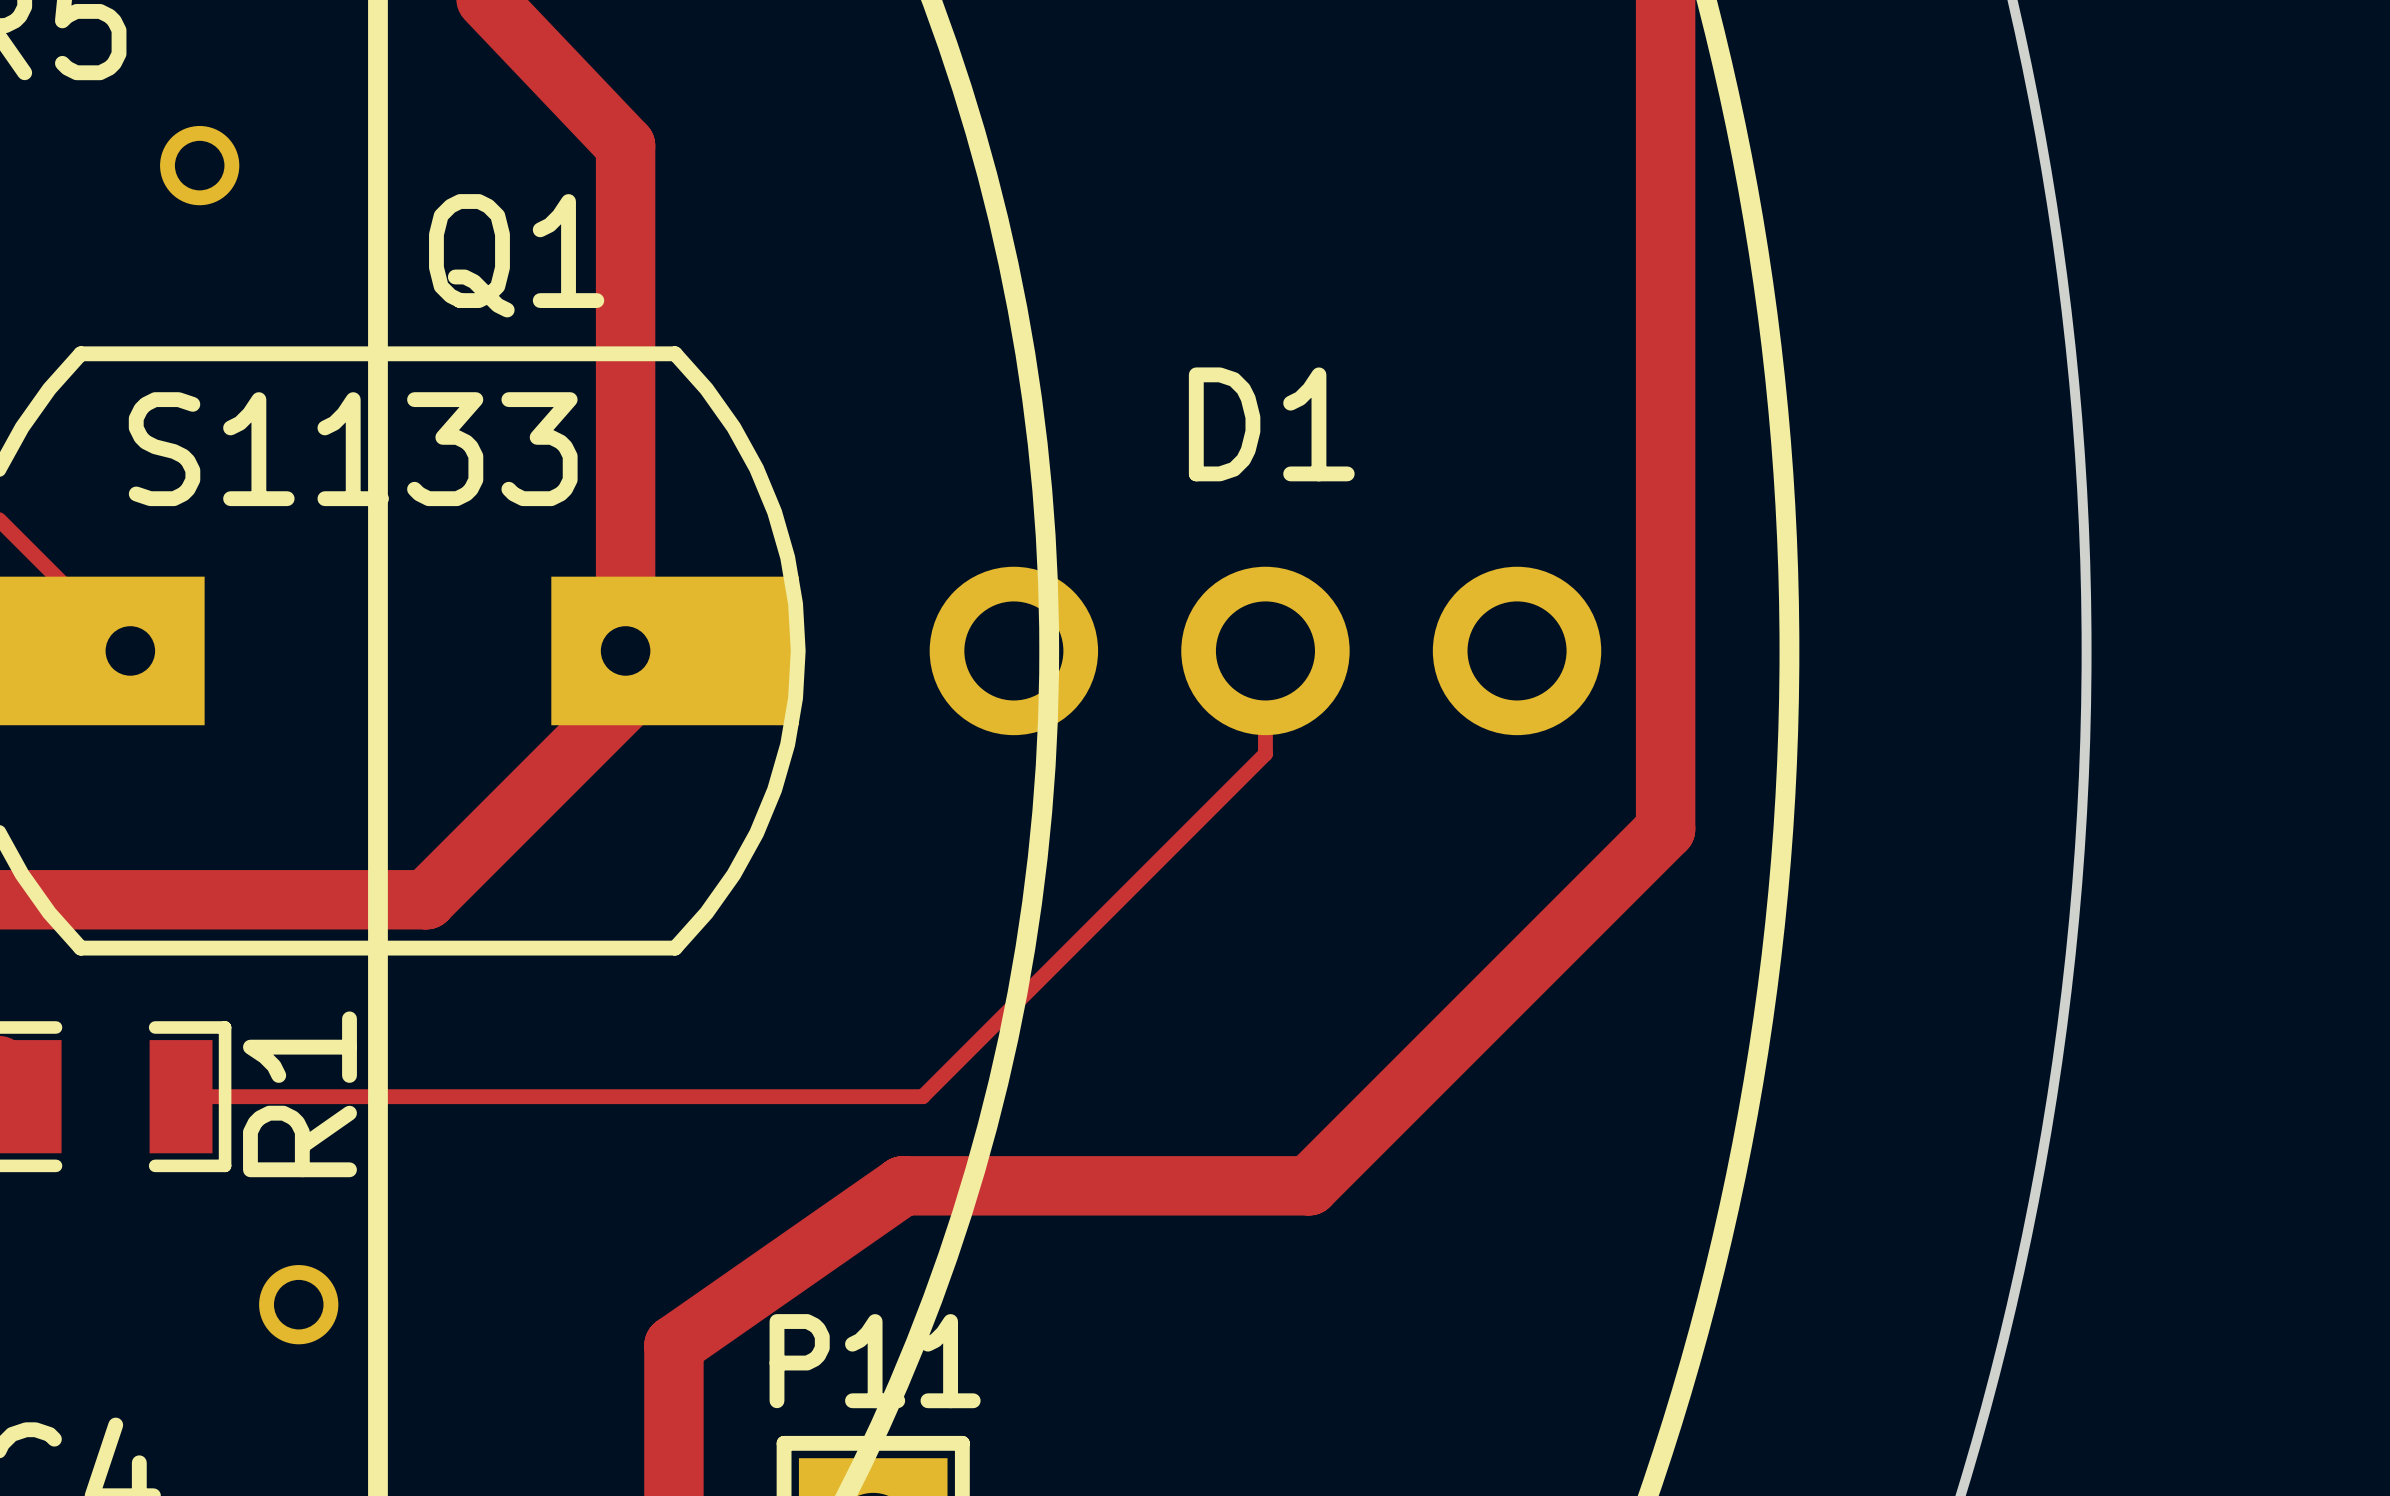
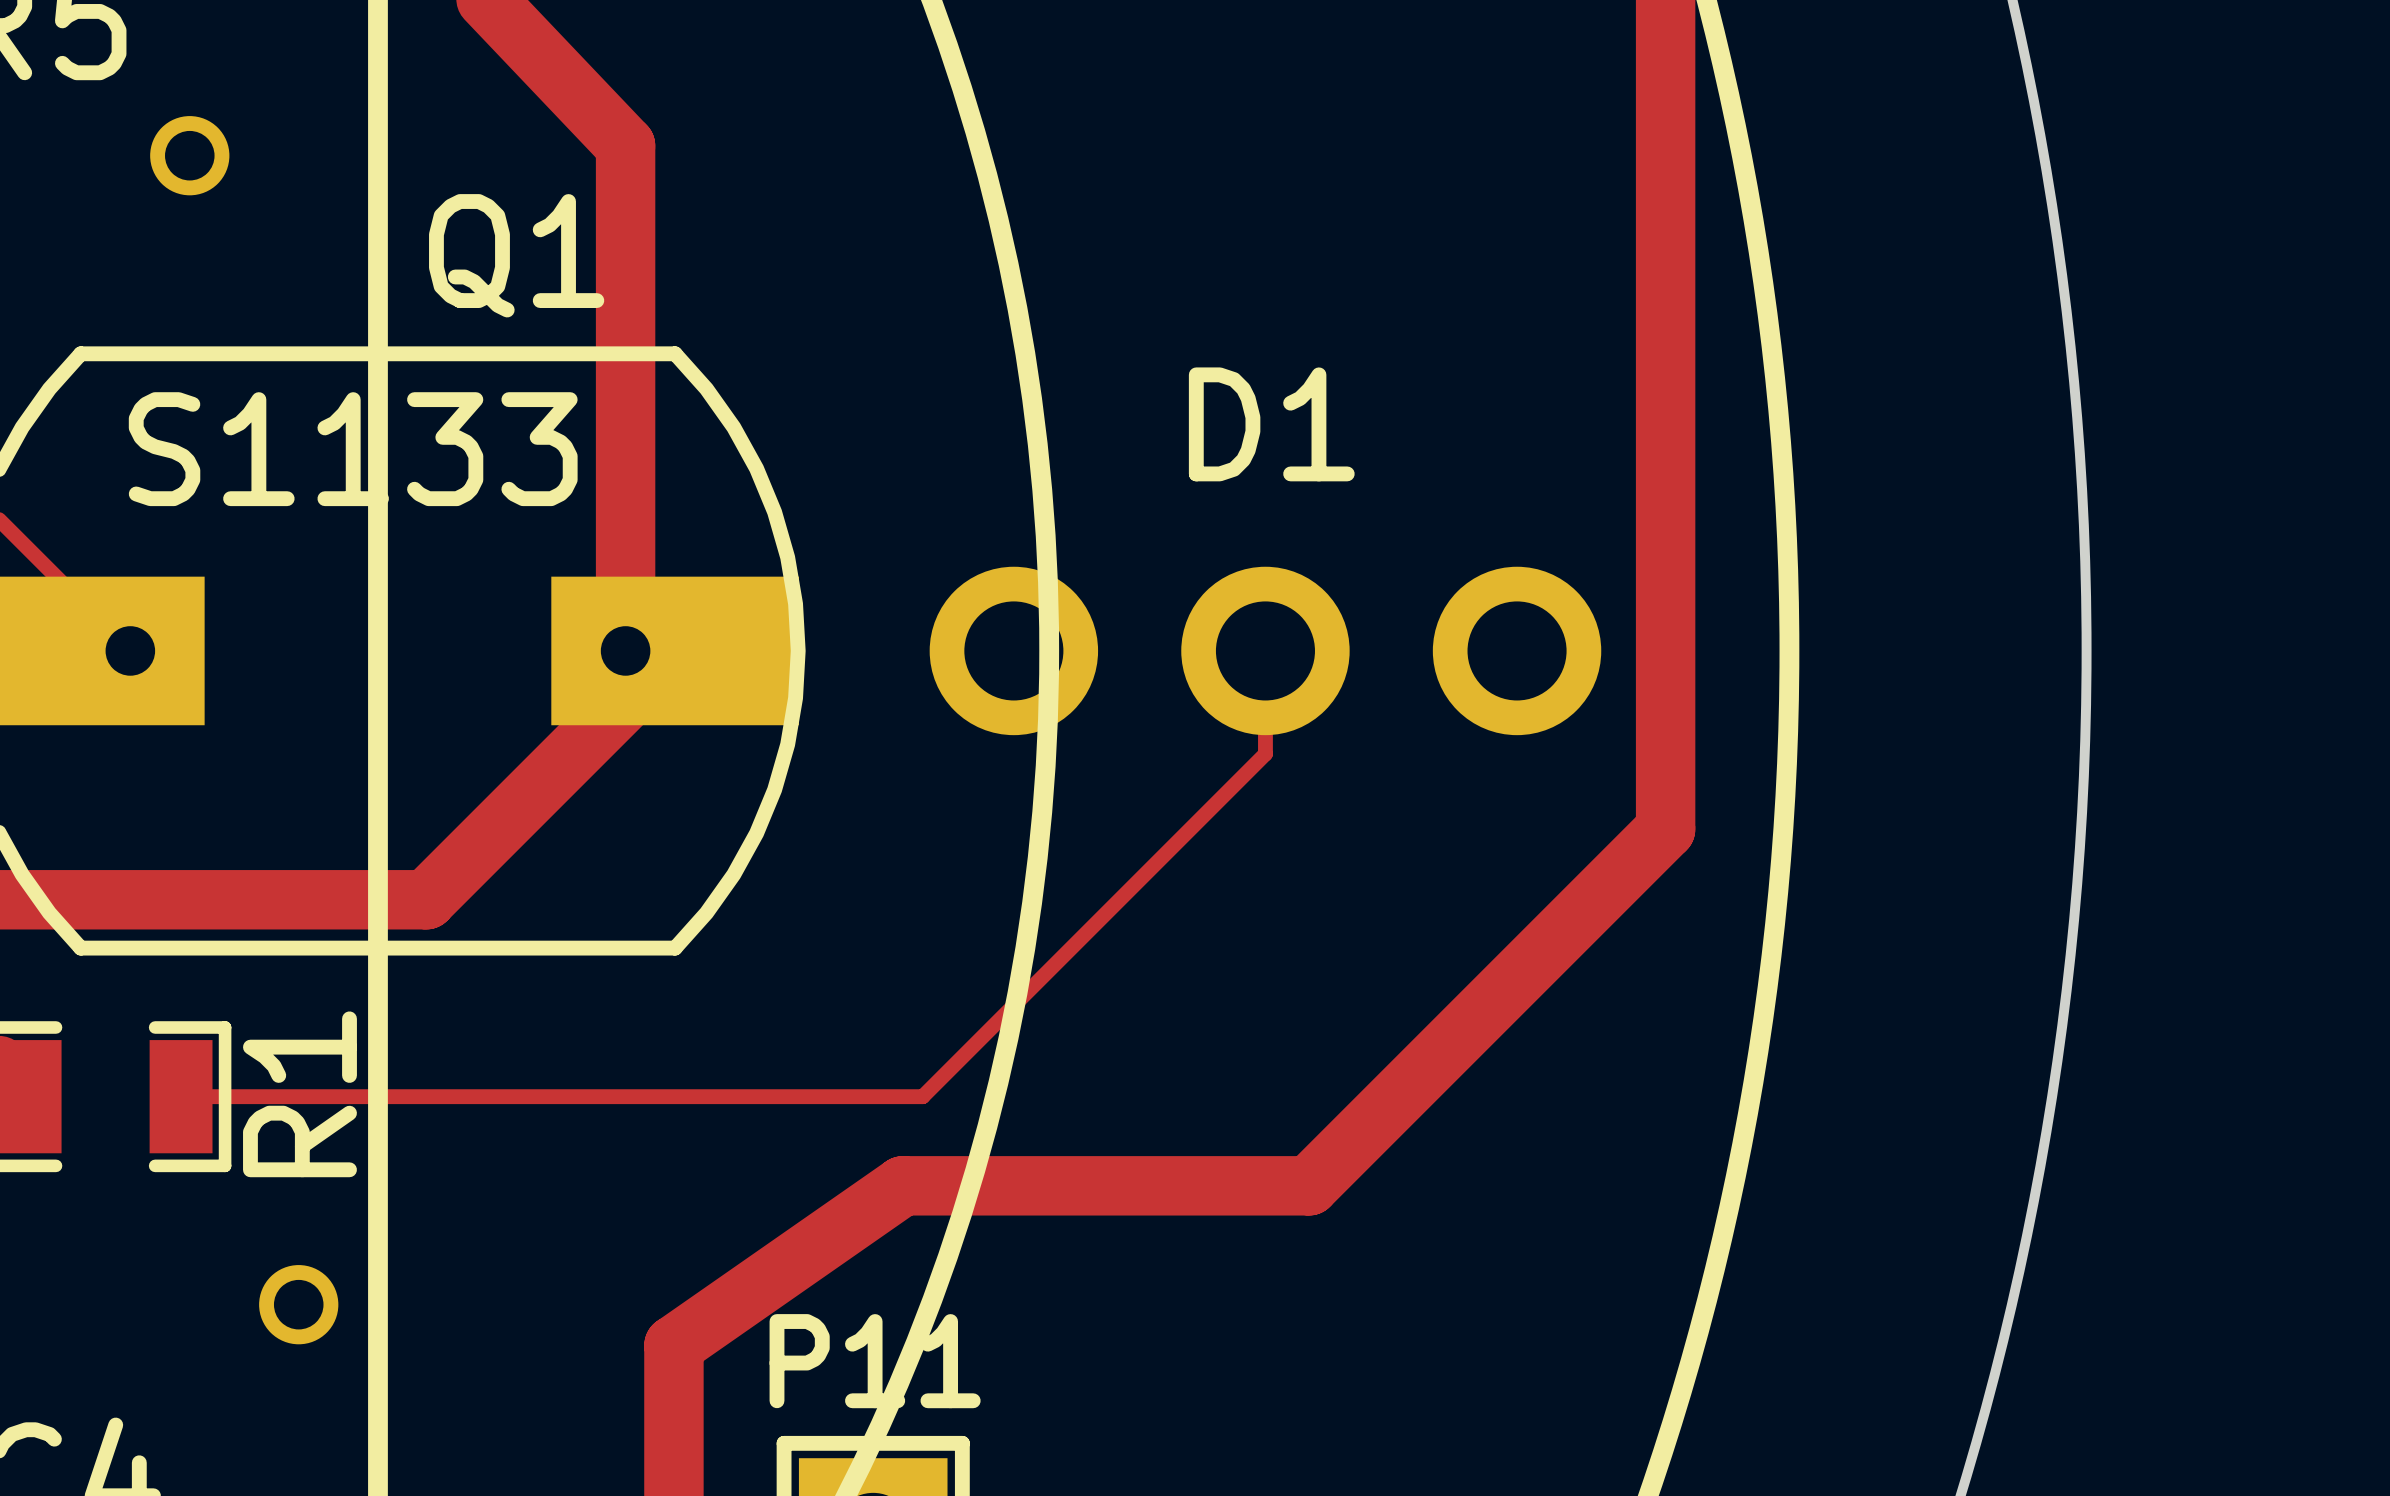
part position: (199, 165) -> (189, 155)

